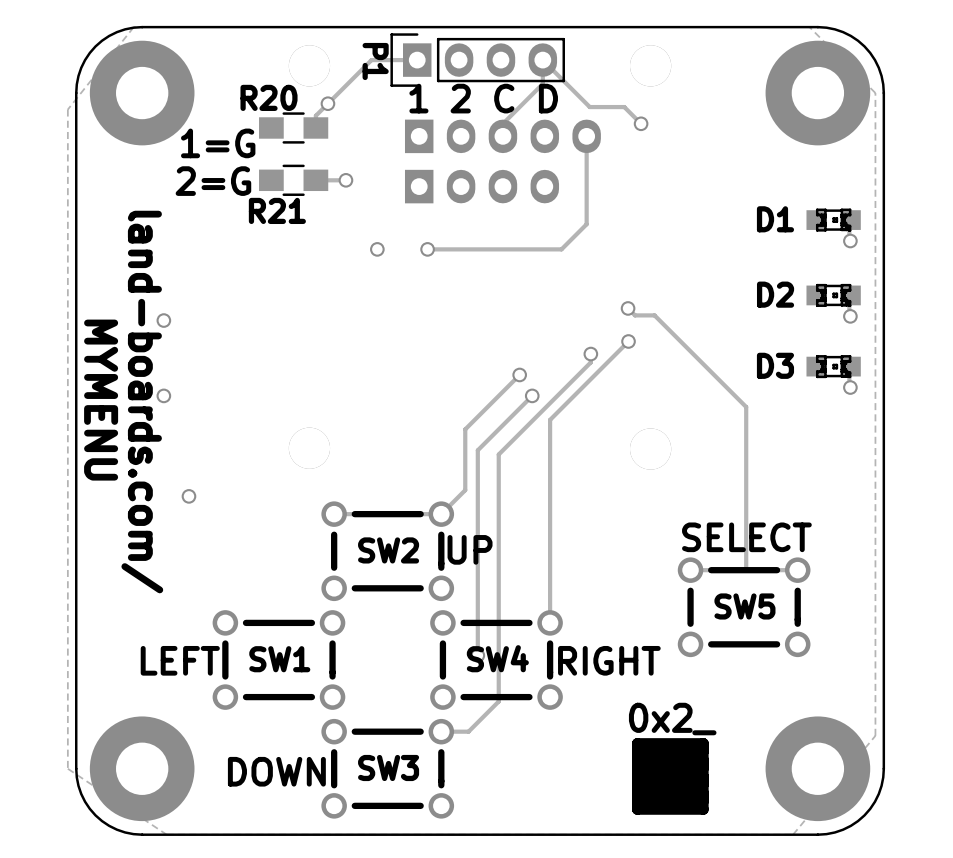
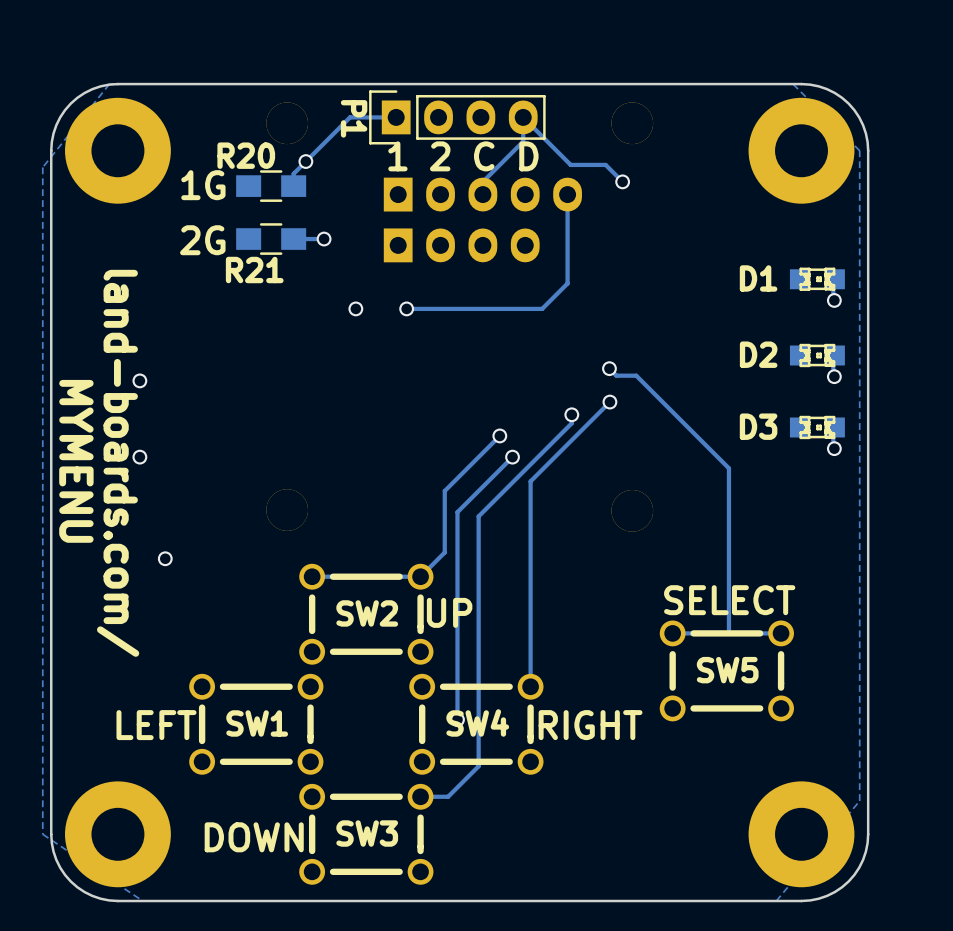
text: 1=G (218, 143) -> 1G (203, 185)
text: 2=G (213, 181) -> 2G (202, 240)
0x2_: (670, 776) -> none

